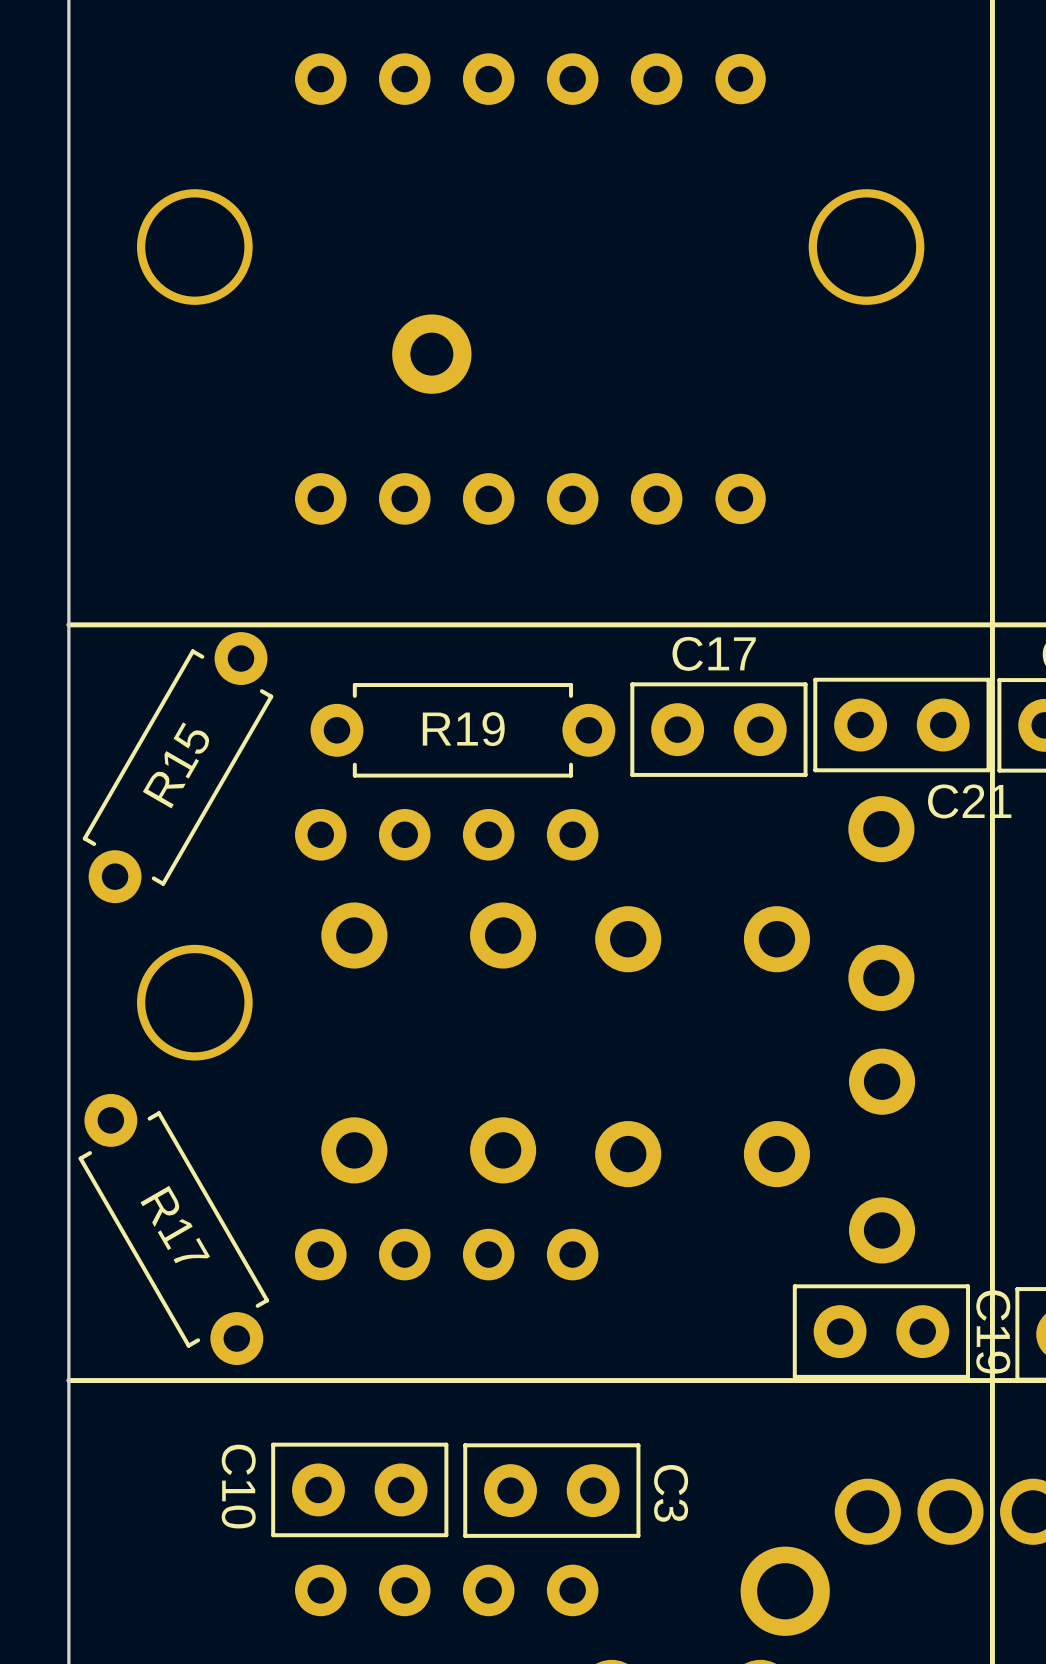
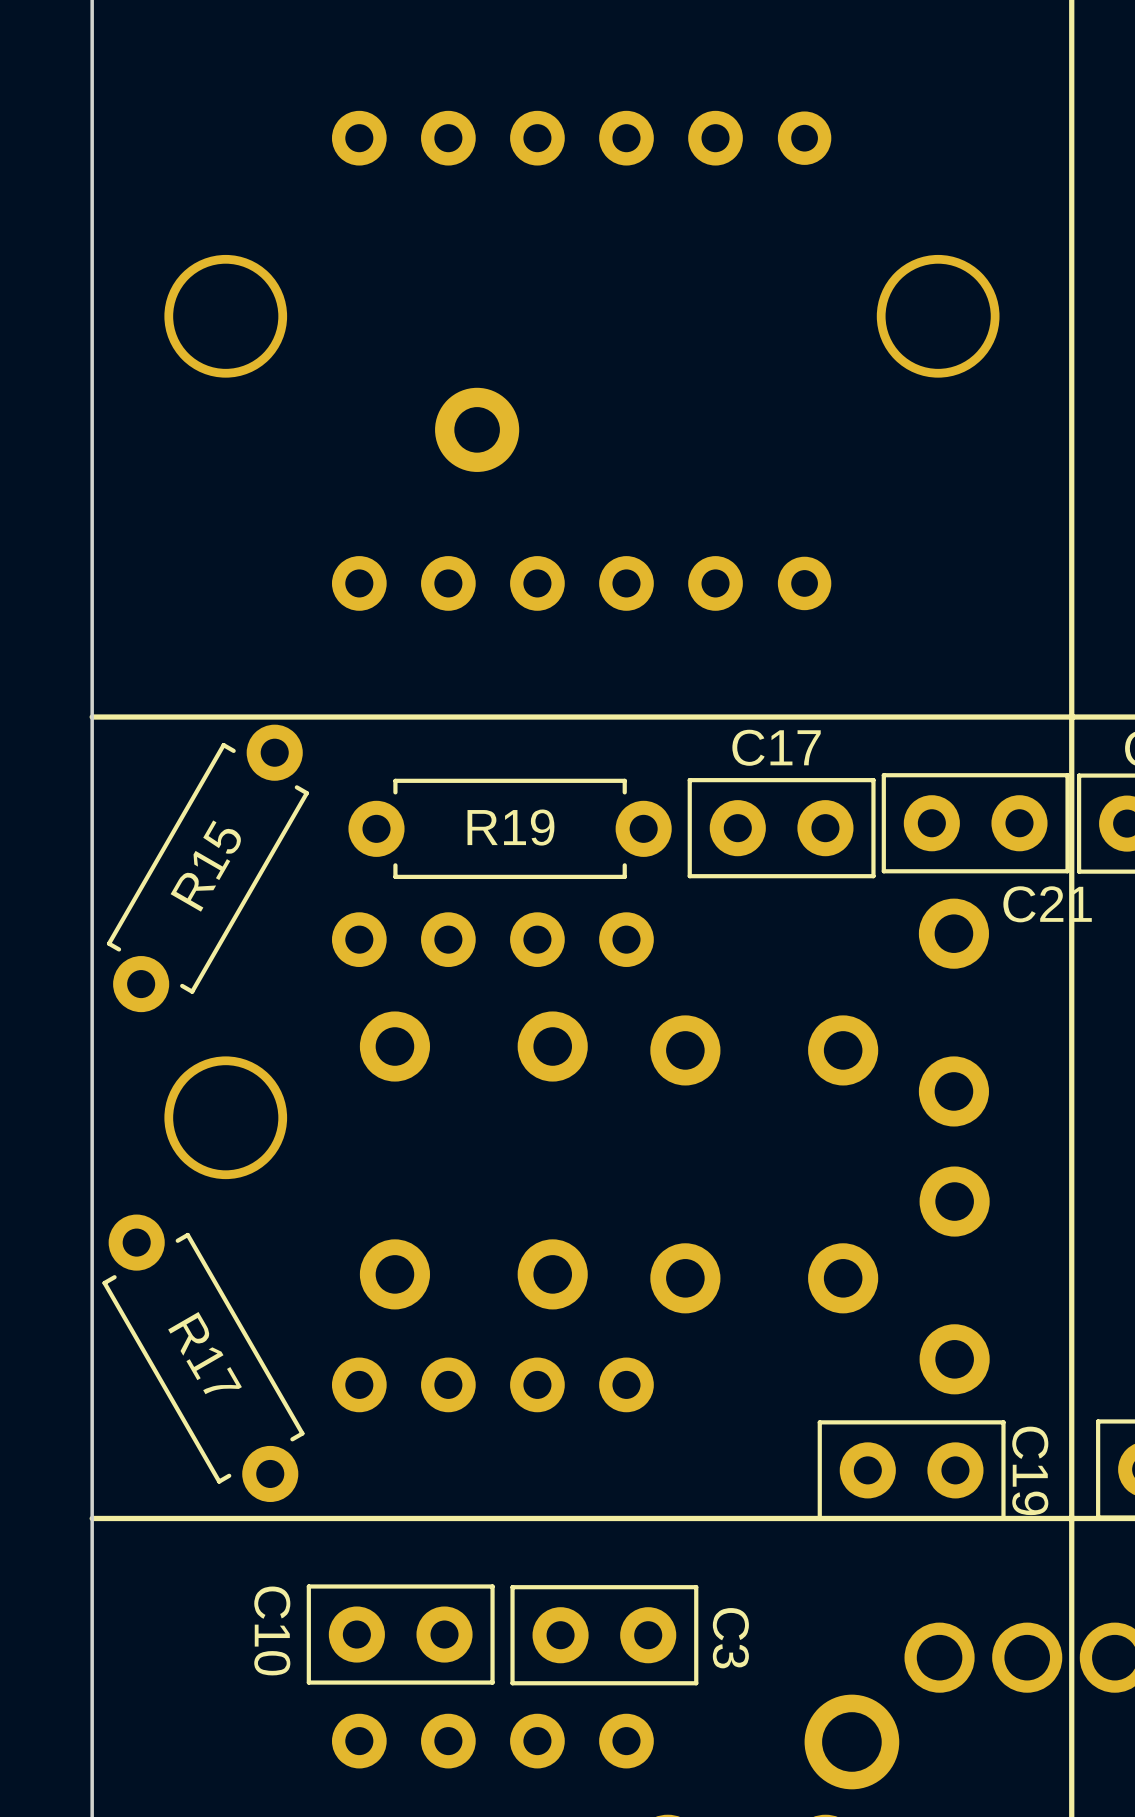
C19 position: (881, 1331) -> (911, 1470)

